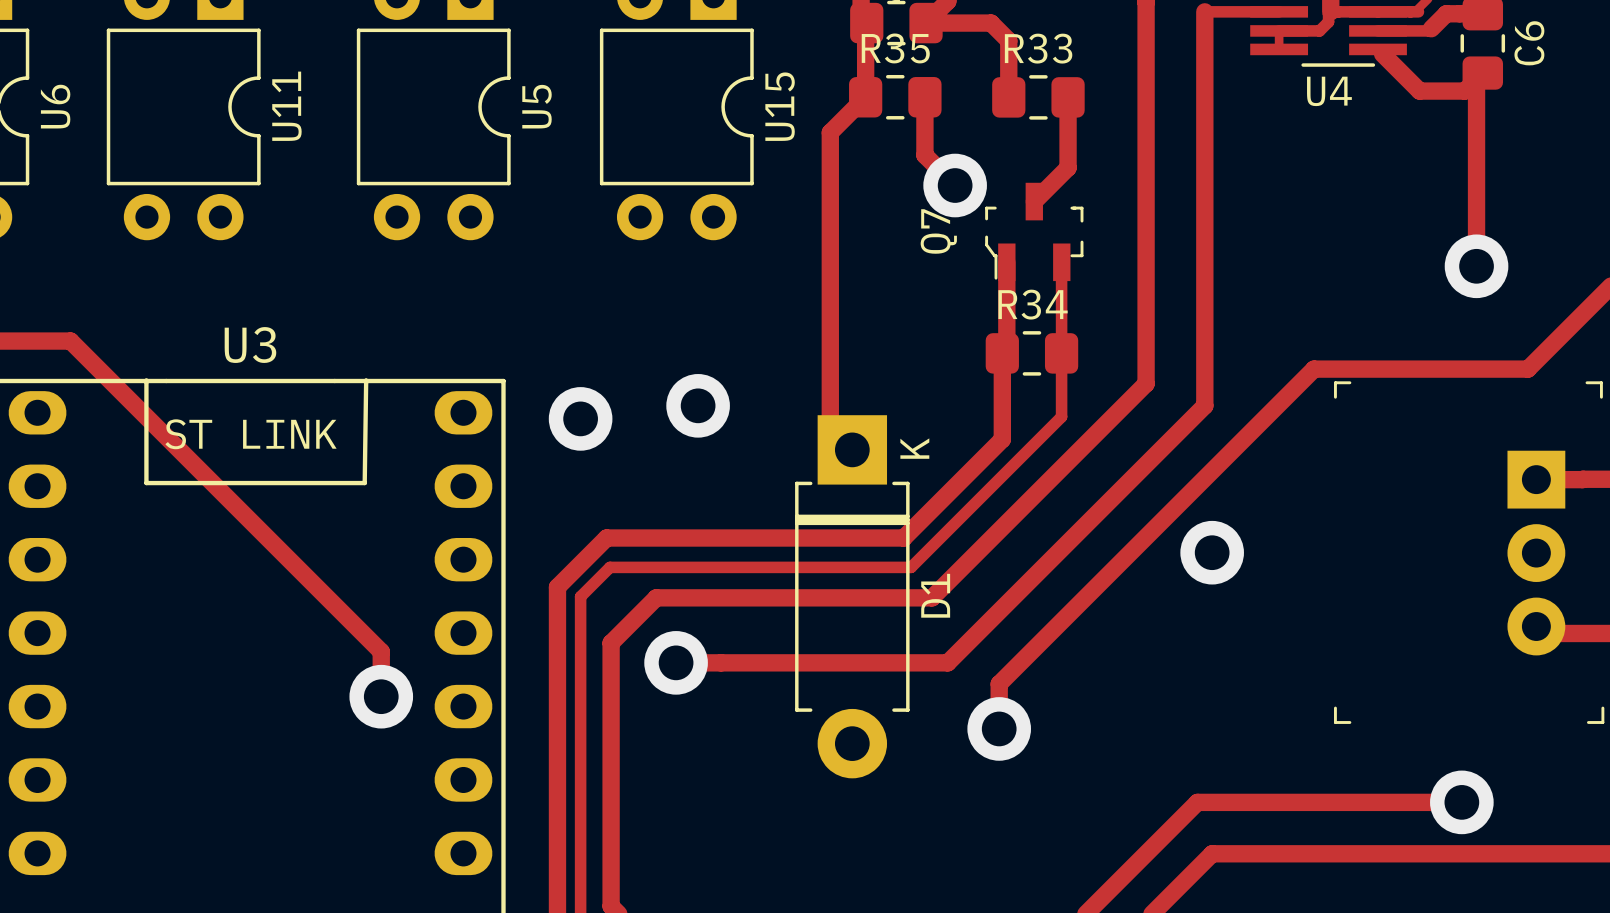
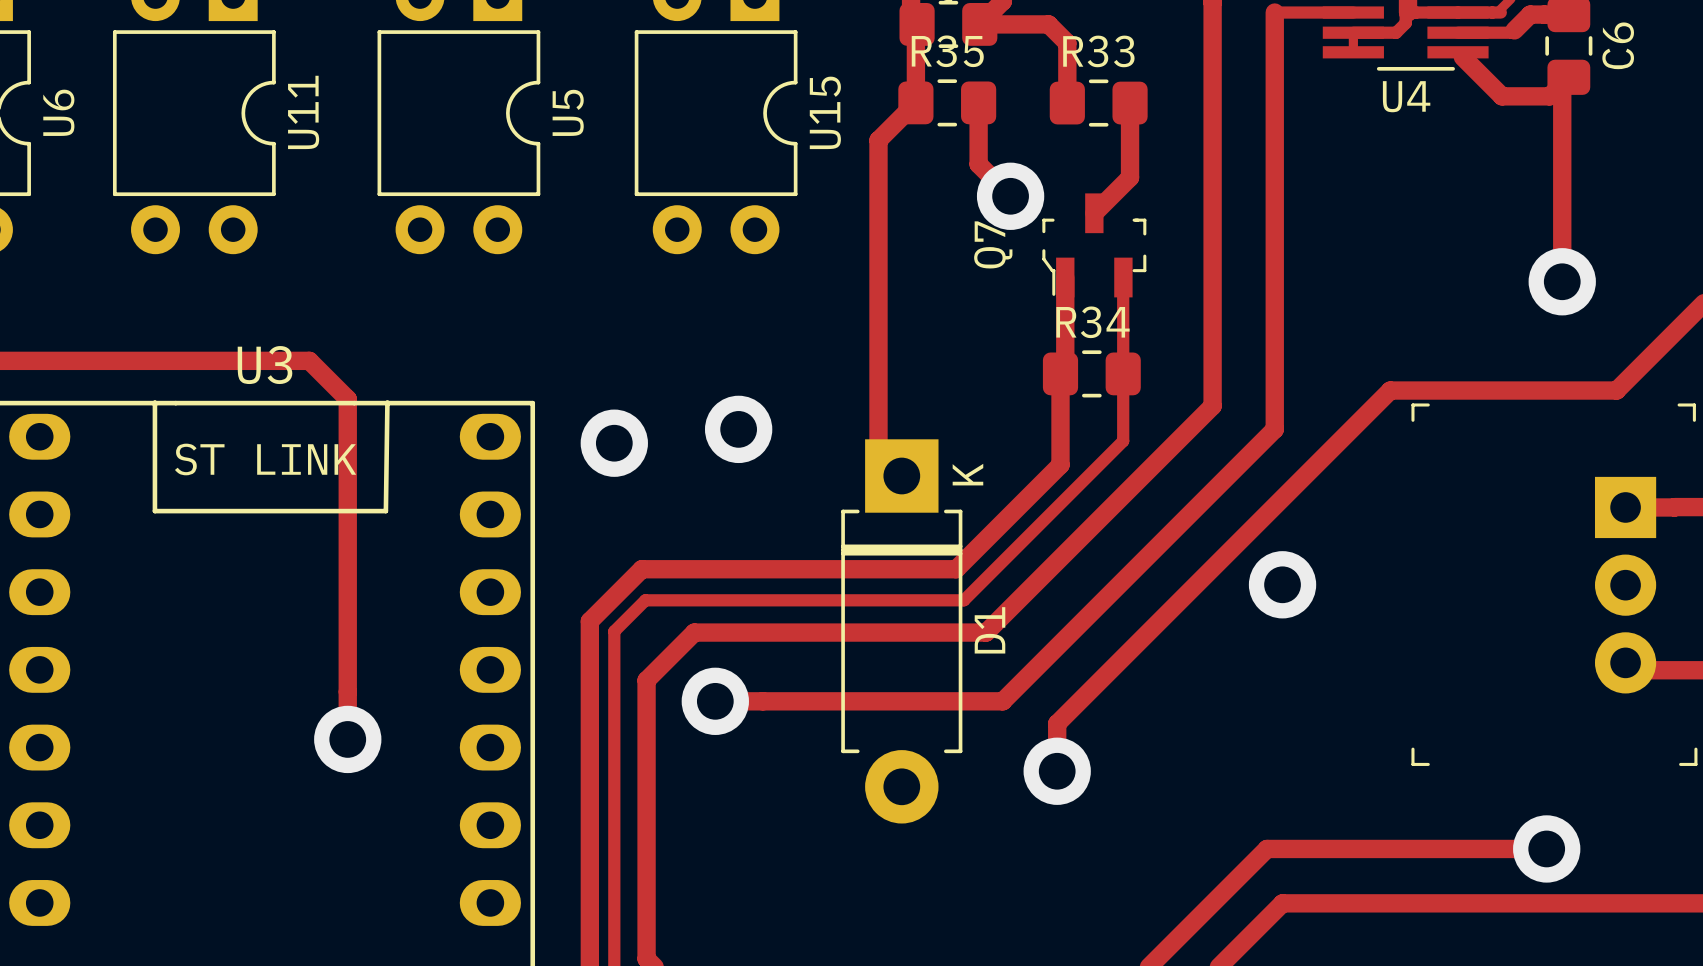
track: (70, 341) (381, 651) (381, 696) -> (74, 360) (309, 360) (347, 399) (347, 739)
via position: (381, 696) -> (347, 739)

